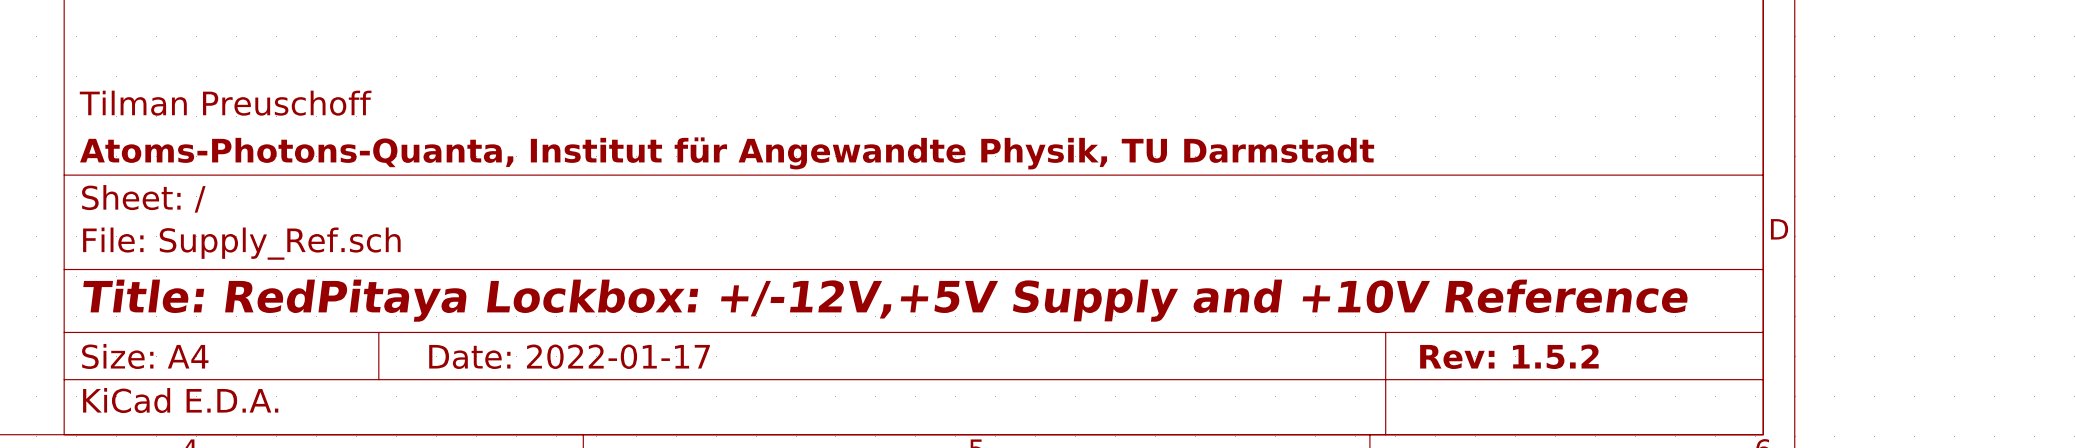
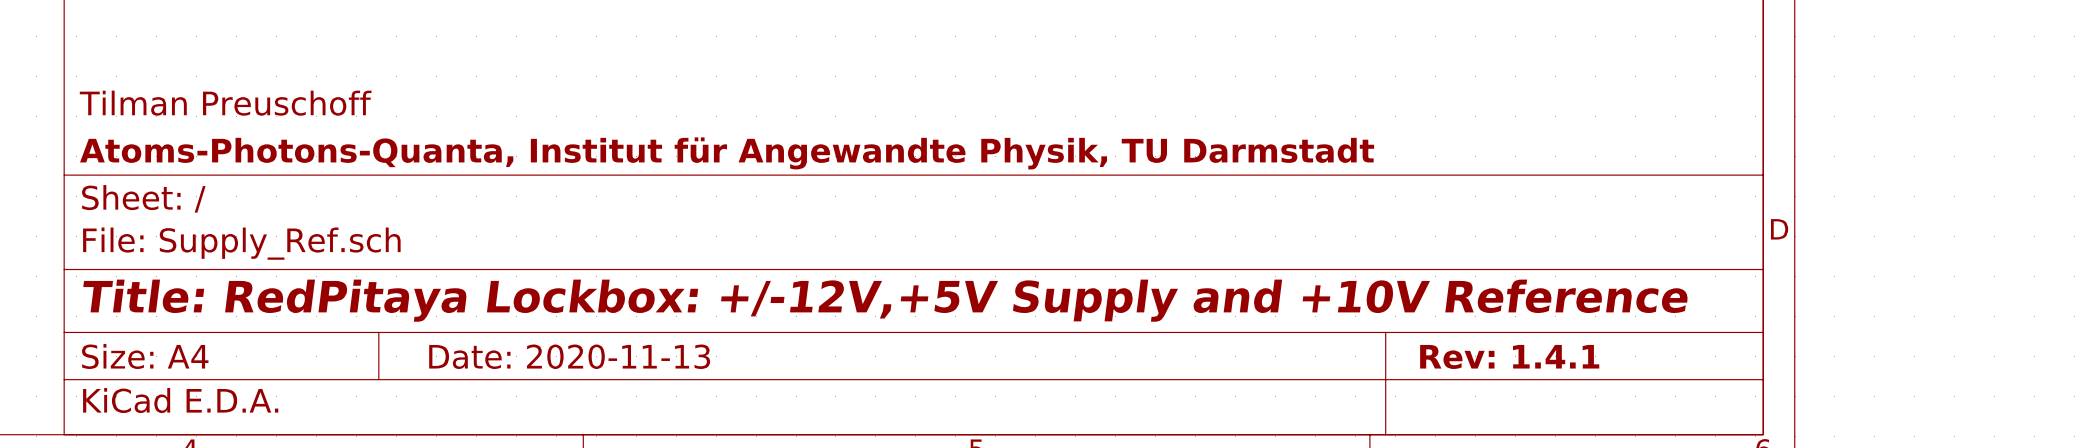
title block: Date: 2022-01-17 (569, 356) -> Date: 2020-11-13 (569, 356)
title block: Rev: 1.5.2 (1509, 356) -> Rev: 1.4.1 (1509, 356)

